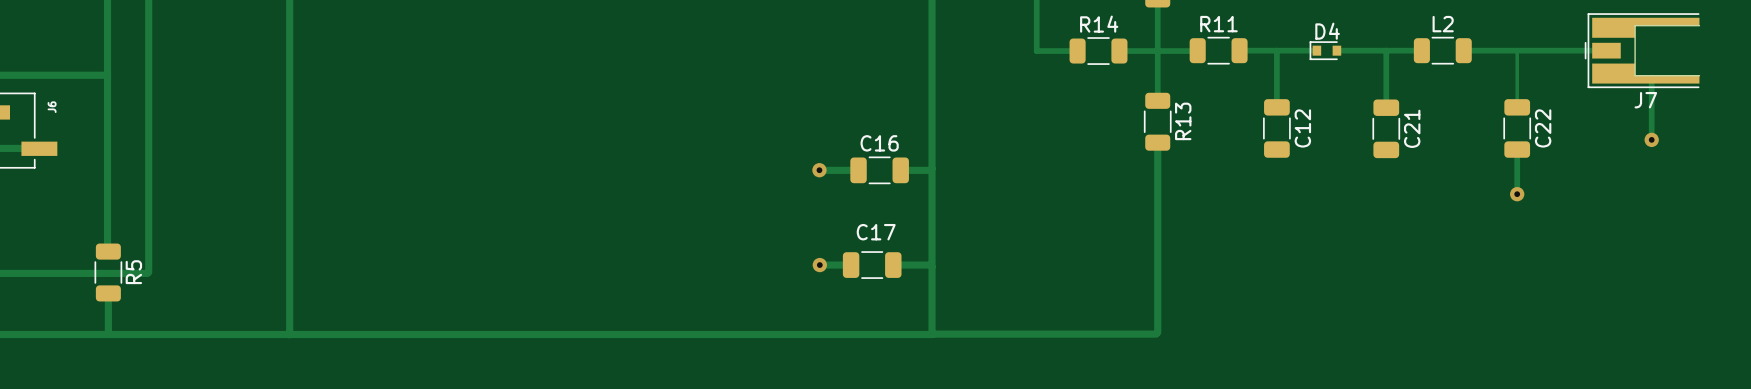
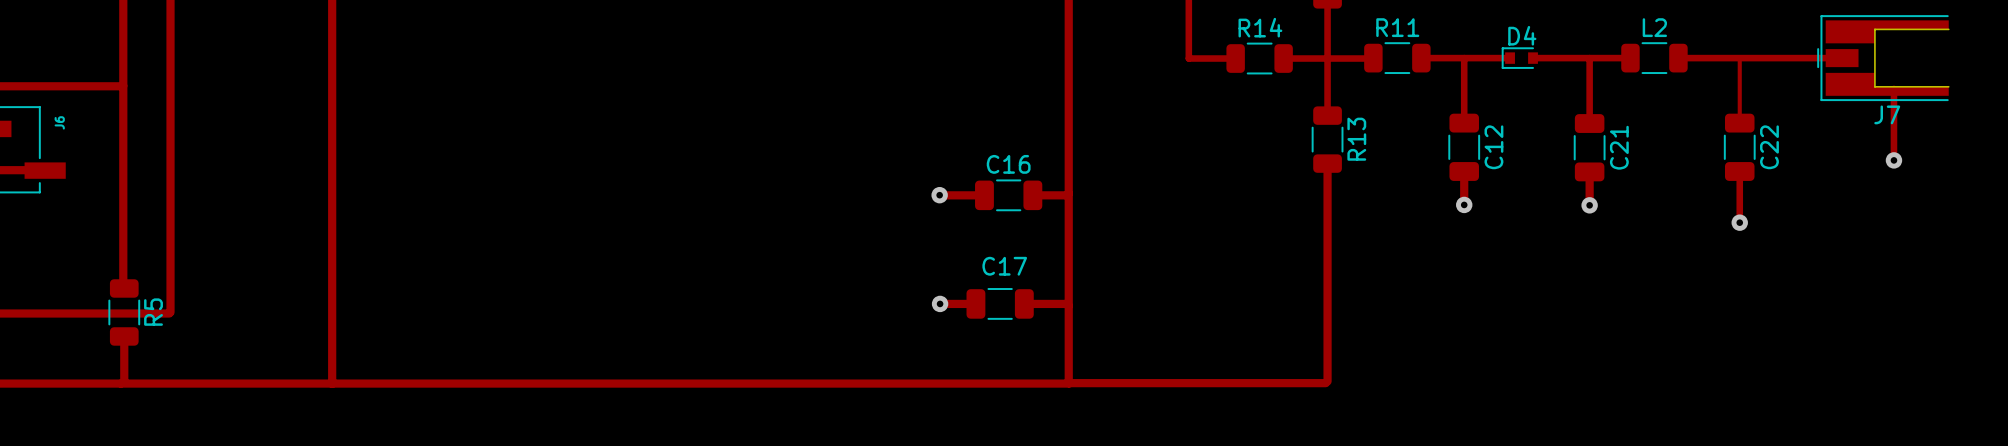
track: none -> (1464, 171) (1463, 205)
track: none -> (1589, 171) (1589, 205)
via: none -> (1464, 204)
via: none -> (1589, 205)

